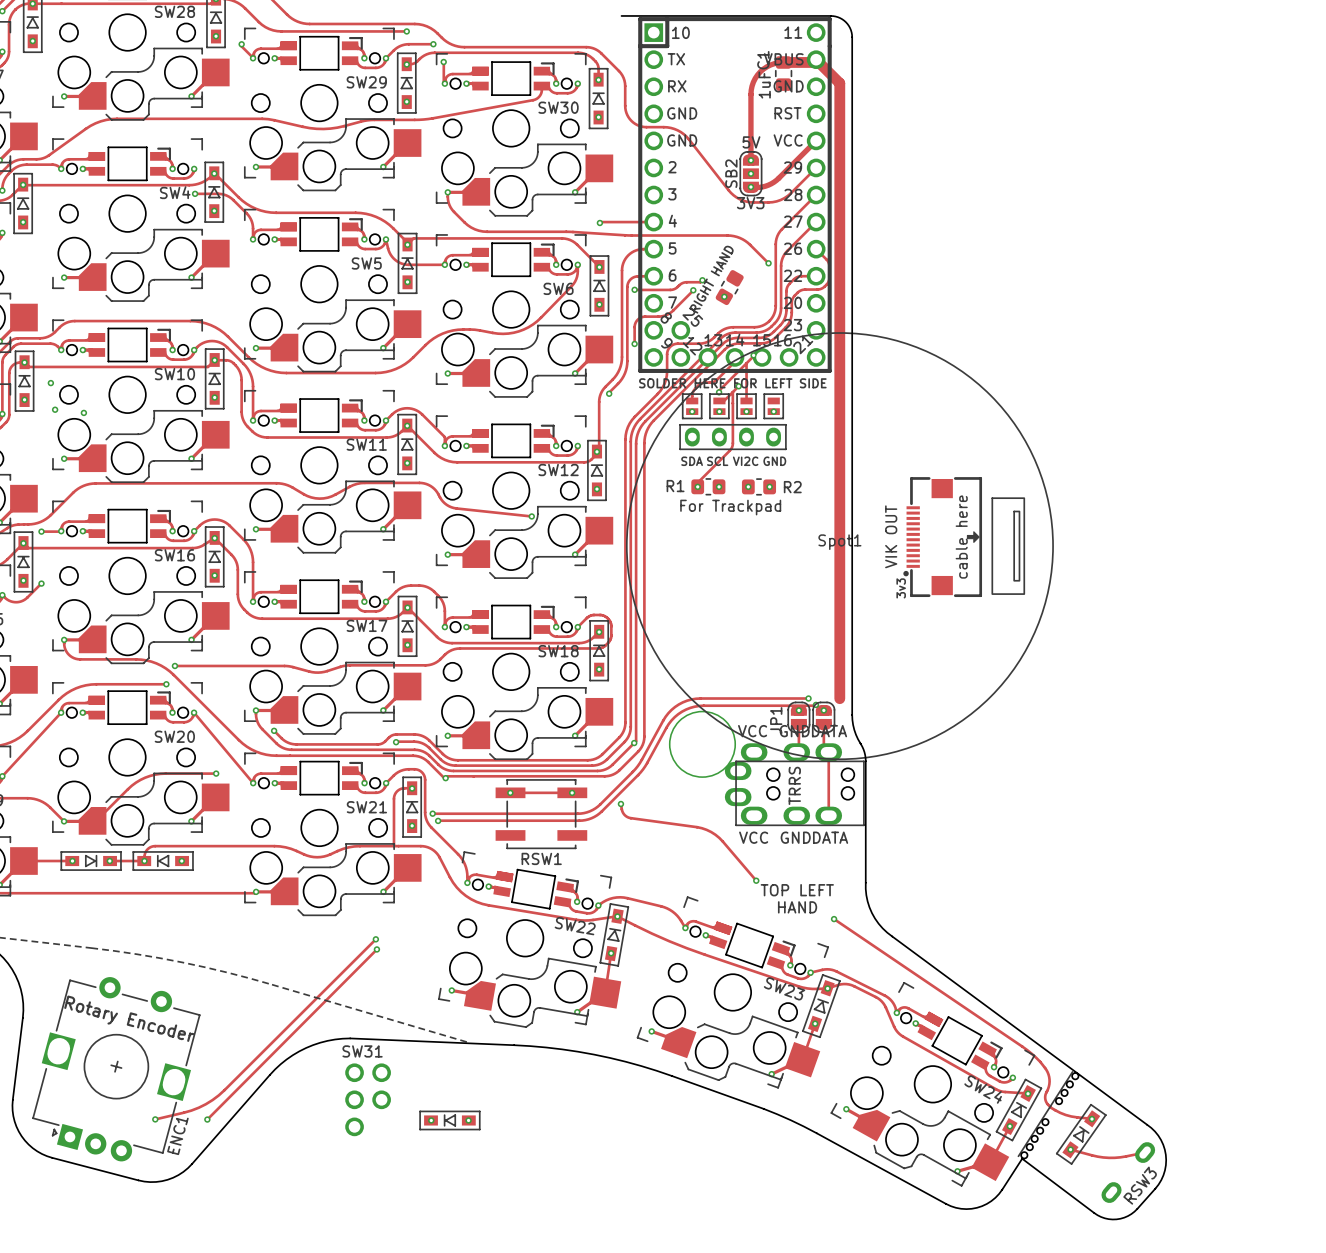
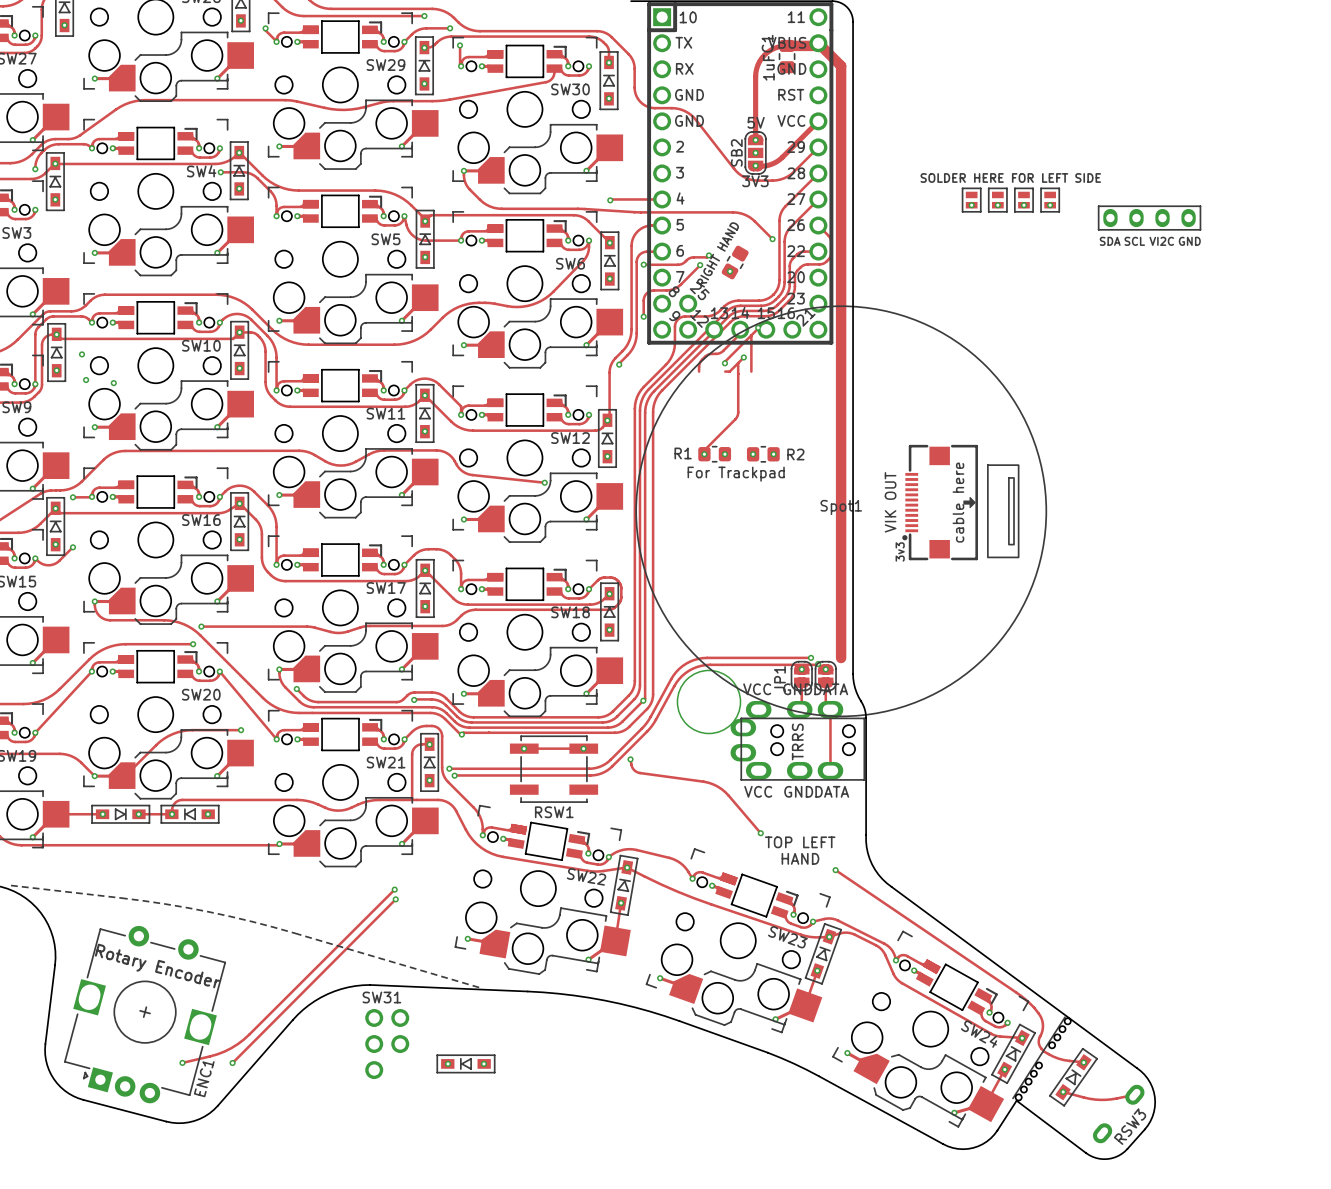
part: none -> (1010, 200)
part: none -> (1149, 218)
part: (732, 406) -> none
part: (732, 437) -> none

